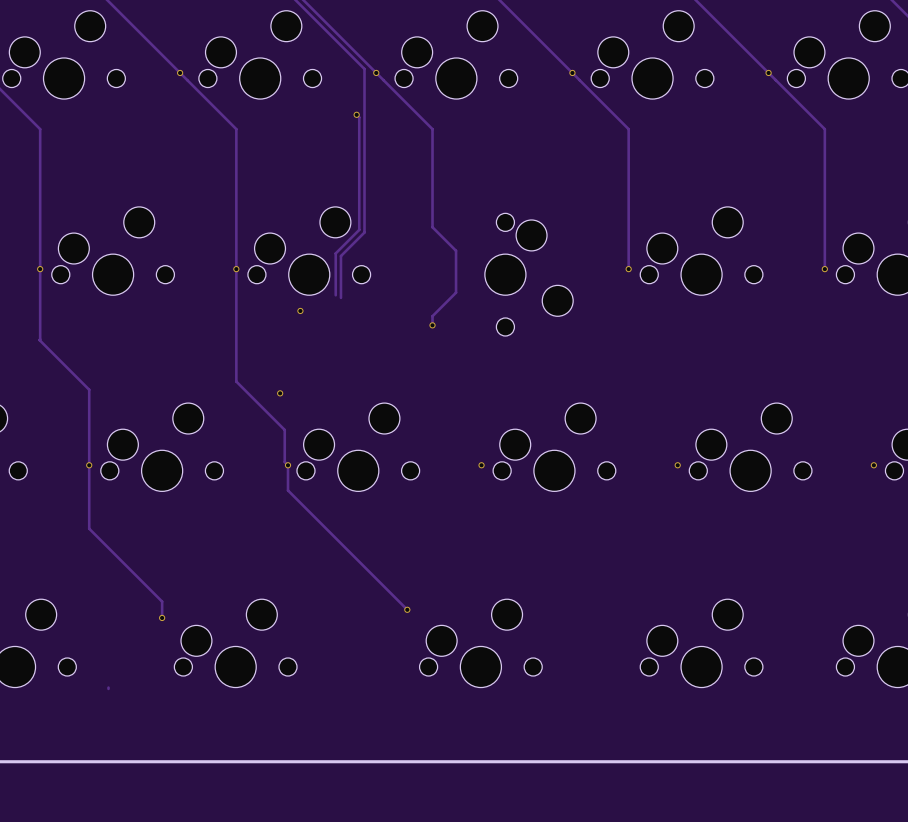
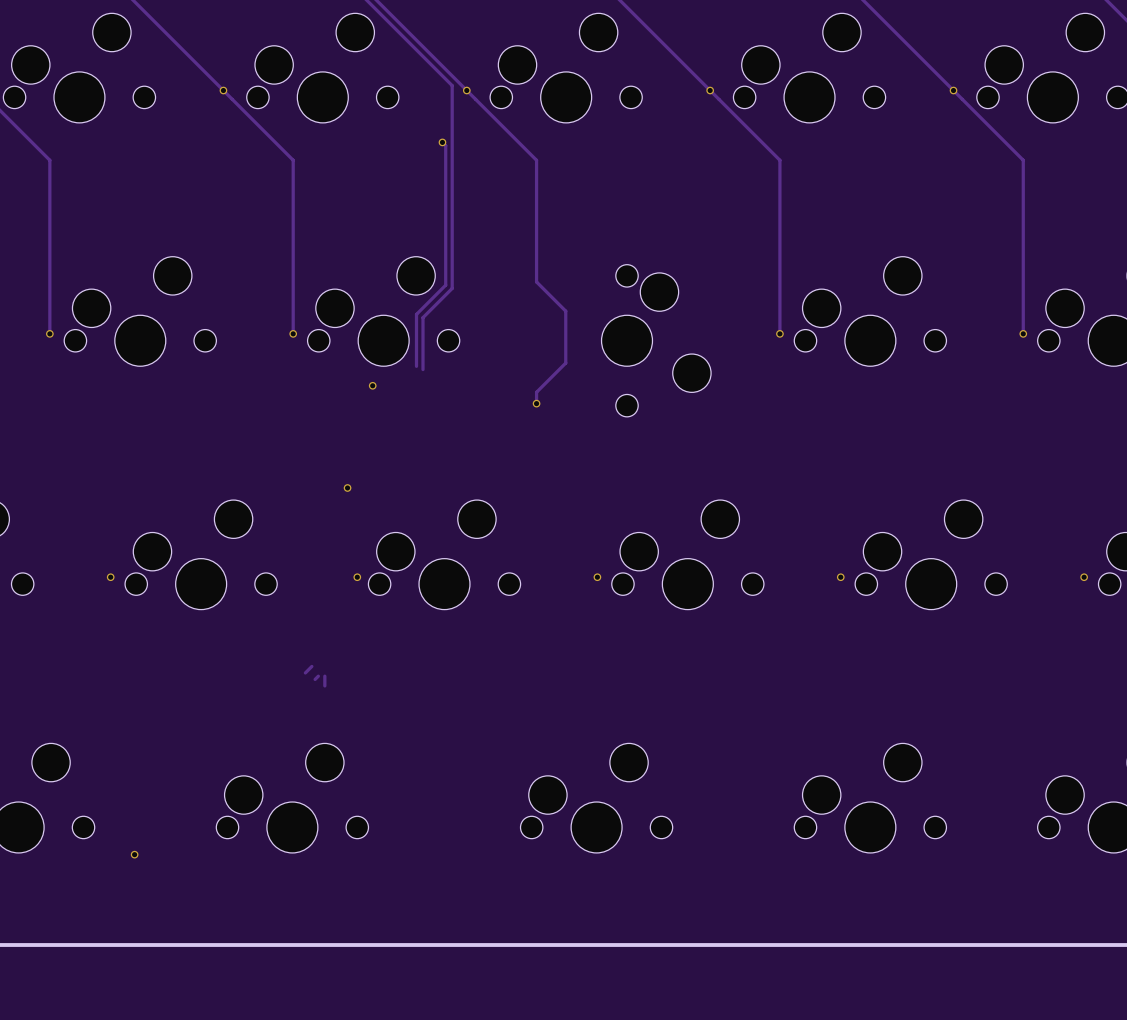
track: (40, 269) (39, 340) (89, 389) (89, 528) (162, 601) (162, 617) -> none
track: (236, 269) (236, 381) (284, 429) (284, 462) (288, 465) (288, 490) (407, 609) -> none
track: none -> (311, 666) (305, 672)
track: none -> (318, 676) (315, 679)
track: none -> (324, 676) (324, 685)
via: (407, 609) -> none
via: (162, 617) -> none
via: none -> (134, 854)

